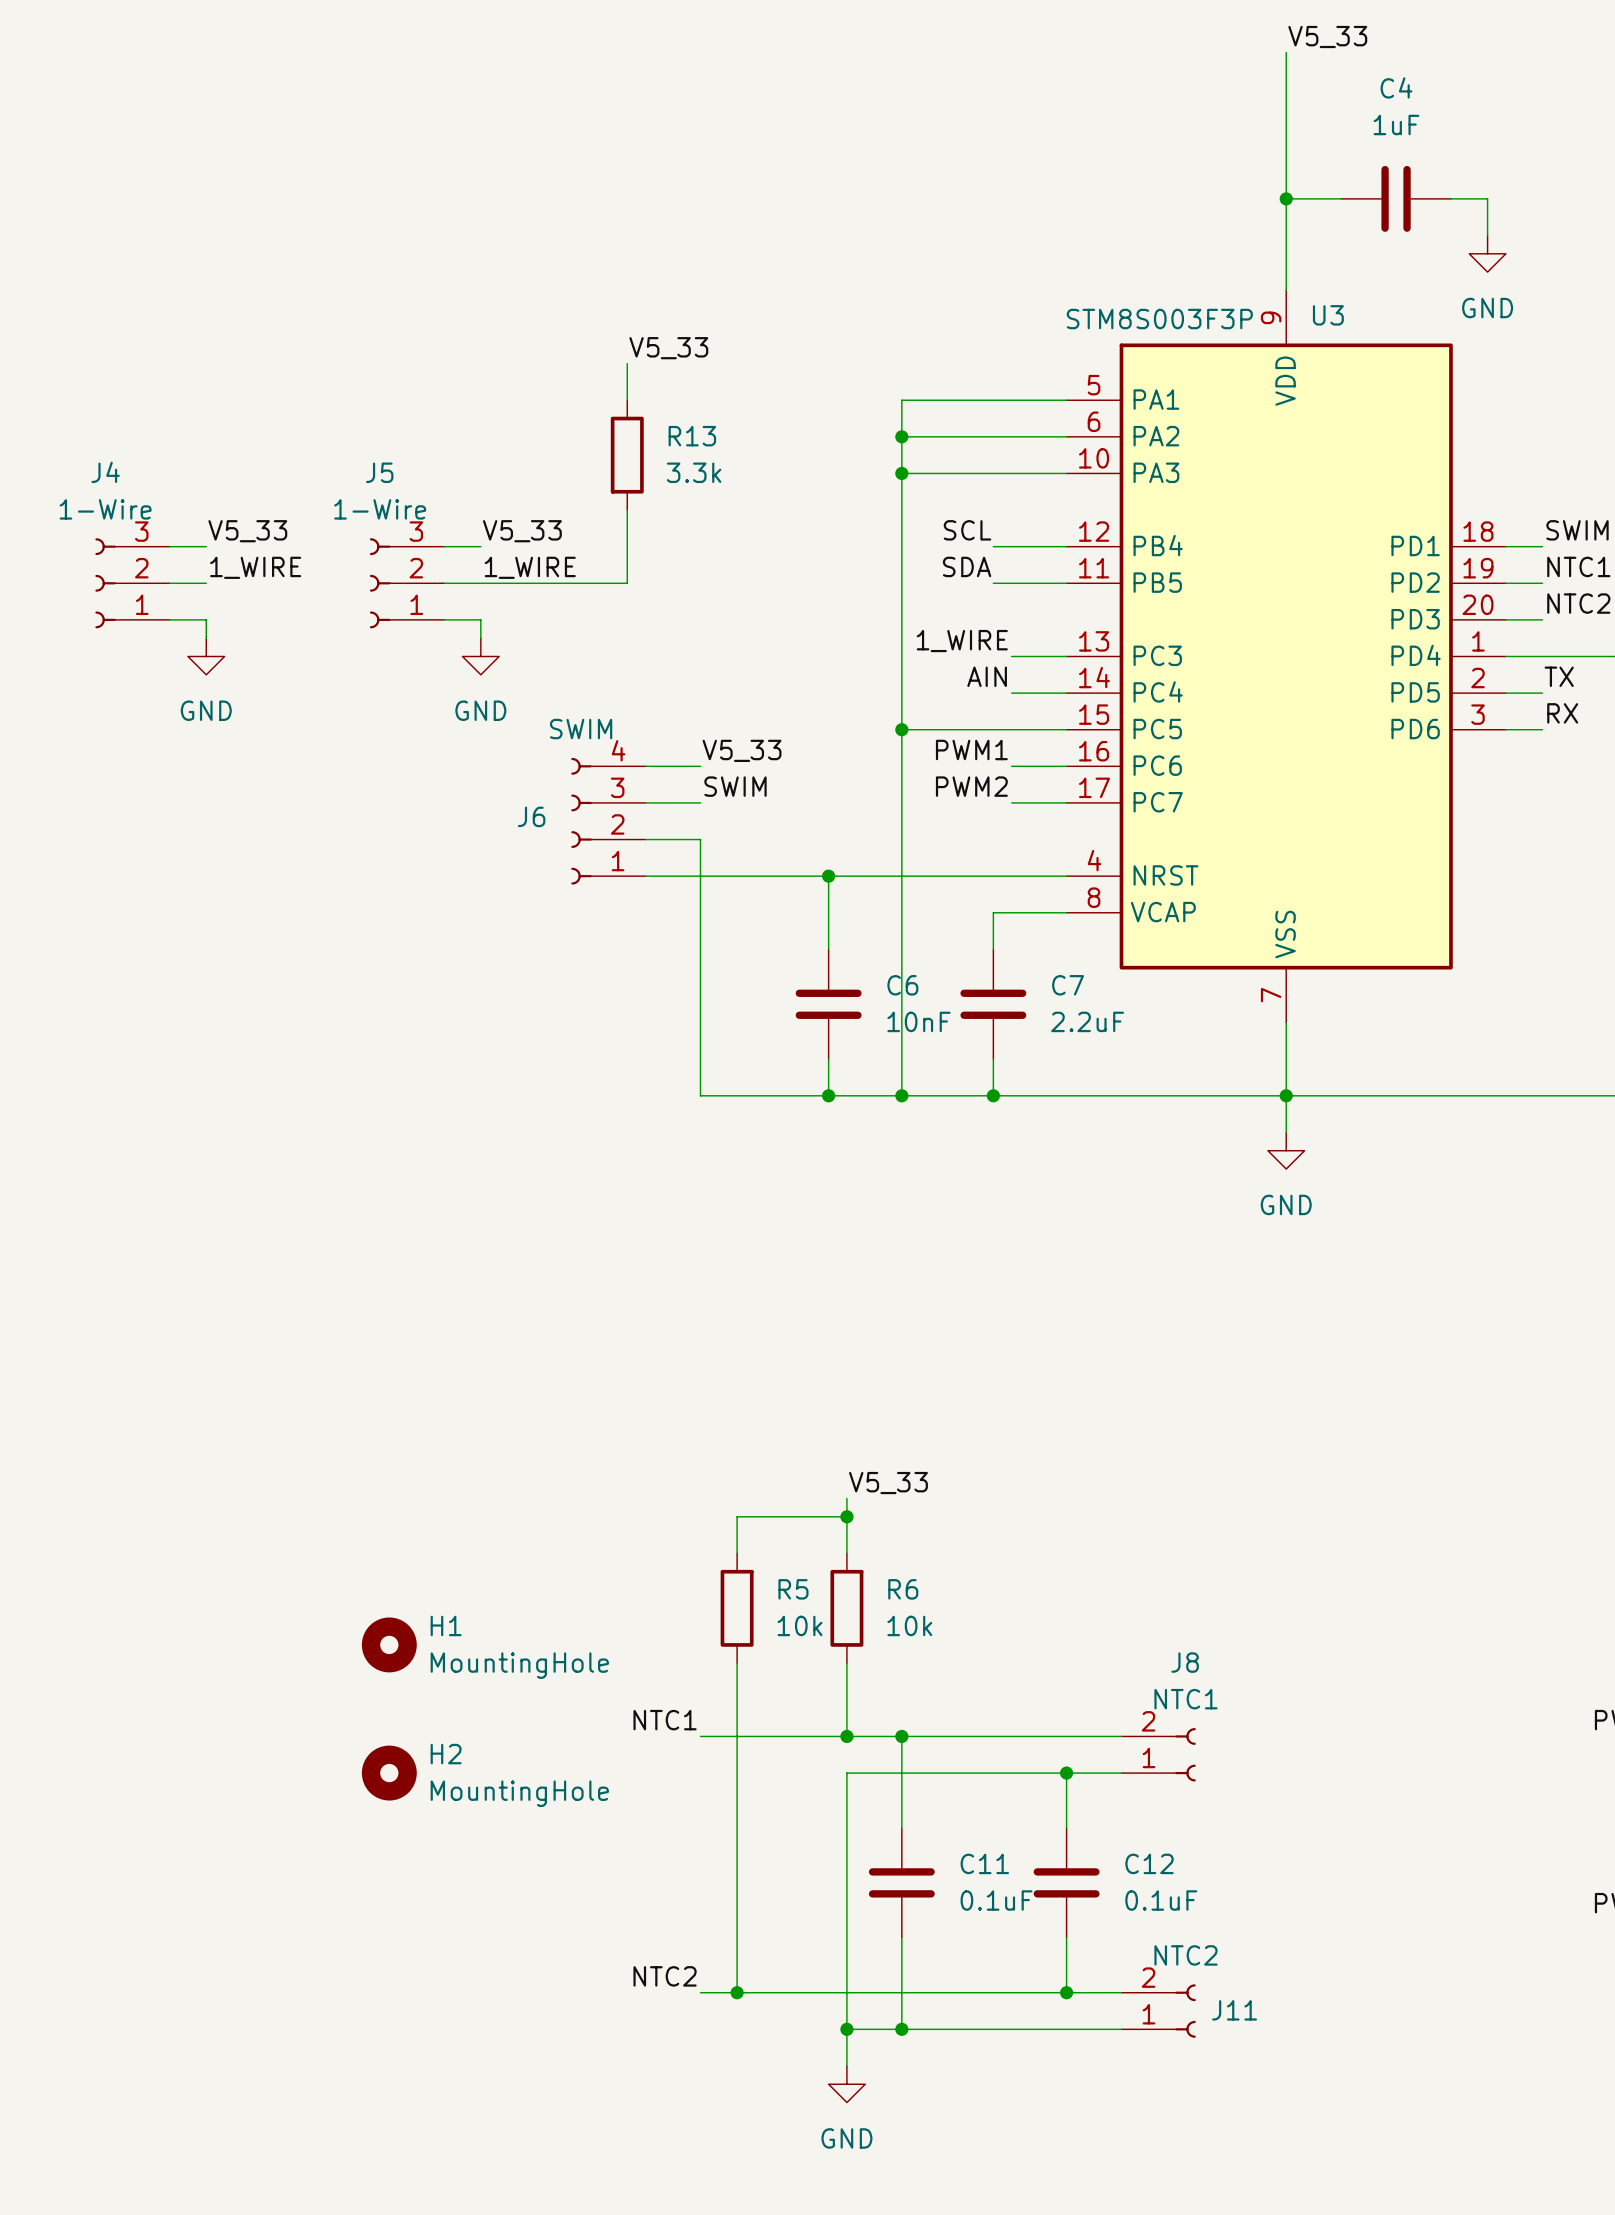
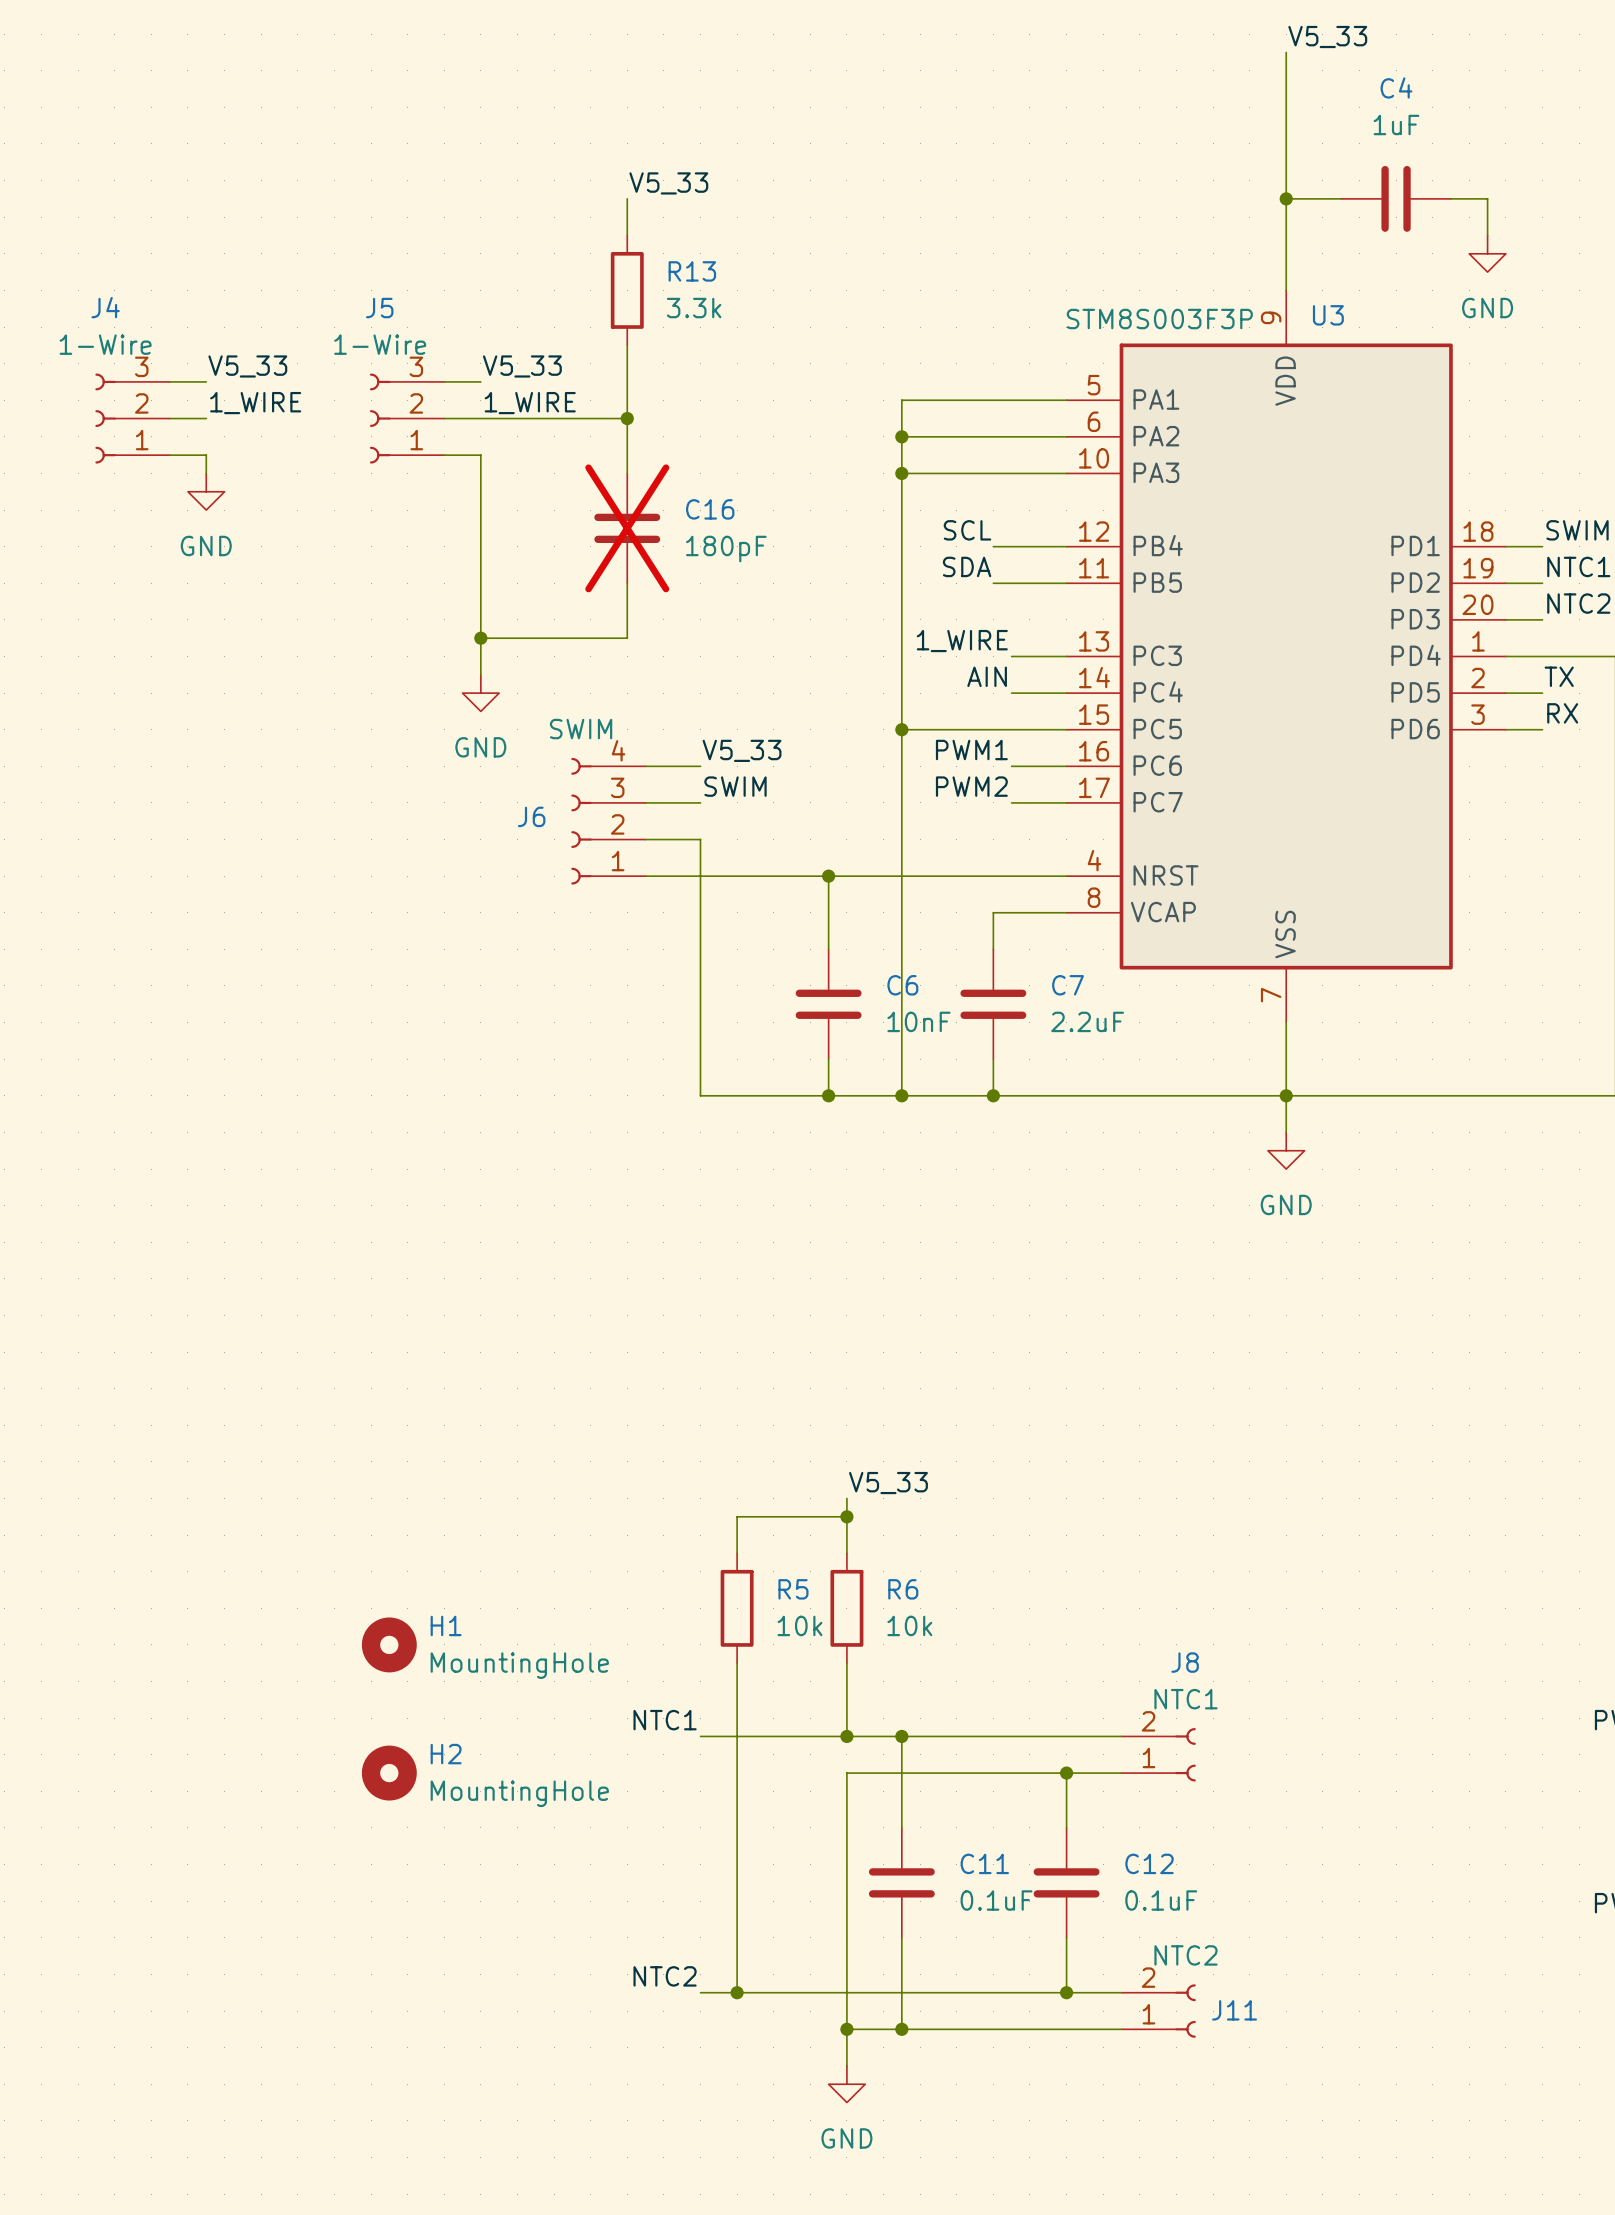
label: none -> V5_33 (668, 183)
wire: none -> (627, 198) (627, 235)
wire: none -> (627, 345) (627, 363)
label: V5_33 (668, 348) -> none
label: none -> V5_33 (247, 366)
label: none -> V5_33 (522, 366)
wire: none -> (627, 400) (627, 473)
label: none -> 1_WIRE (255, 403)
label: none -> 1_WIRE (530, 403)
wire: none -> (444, 418) (627, 418)
junction: none -> (627, 418)
R13 position: (627, 455) -> (627, 290)
power symbol: none -> GND (206, 491)
wire: (627, 510) (627, 583) (444, 583) -> none
C16: none -> 180pF (627, 528)
label: V5_33 (247, 531) -> none
label: V5_33 (522, 531) -> none
wire: (169, 546) (206, 546) -> (169, 381) (206, 381)
wire: (444, 546) (480, 546) -> (444, 381) (480, 381)
label: 1_WIRE (255, 567) -> none
label: 1_WIRE (530, 567) -> none
J4 position: (132, 583) -> (132, 418)
wire: (169, 583) (206, 583) -> (169, 418) (206, 418)
J5 position: (407, 583) -> (407, 418)
wire: none -> (627, 583) (627, 638) (480, 638) (480, 674)
wire: (169, 619) (206, 619) (206, 638) -> (169, 455) (206, 455) (206, 473)
wire: (444, 619) (480, 619) -> (444, 455) (480, 455) (480, 619)
junction: none -> (480, 638)
power symbol: GND (206, 656) -> none
power symbol position: GND (480, 656) -> GND (480, 693)

